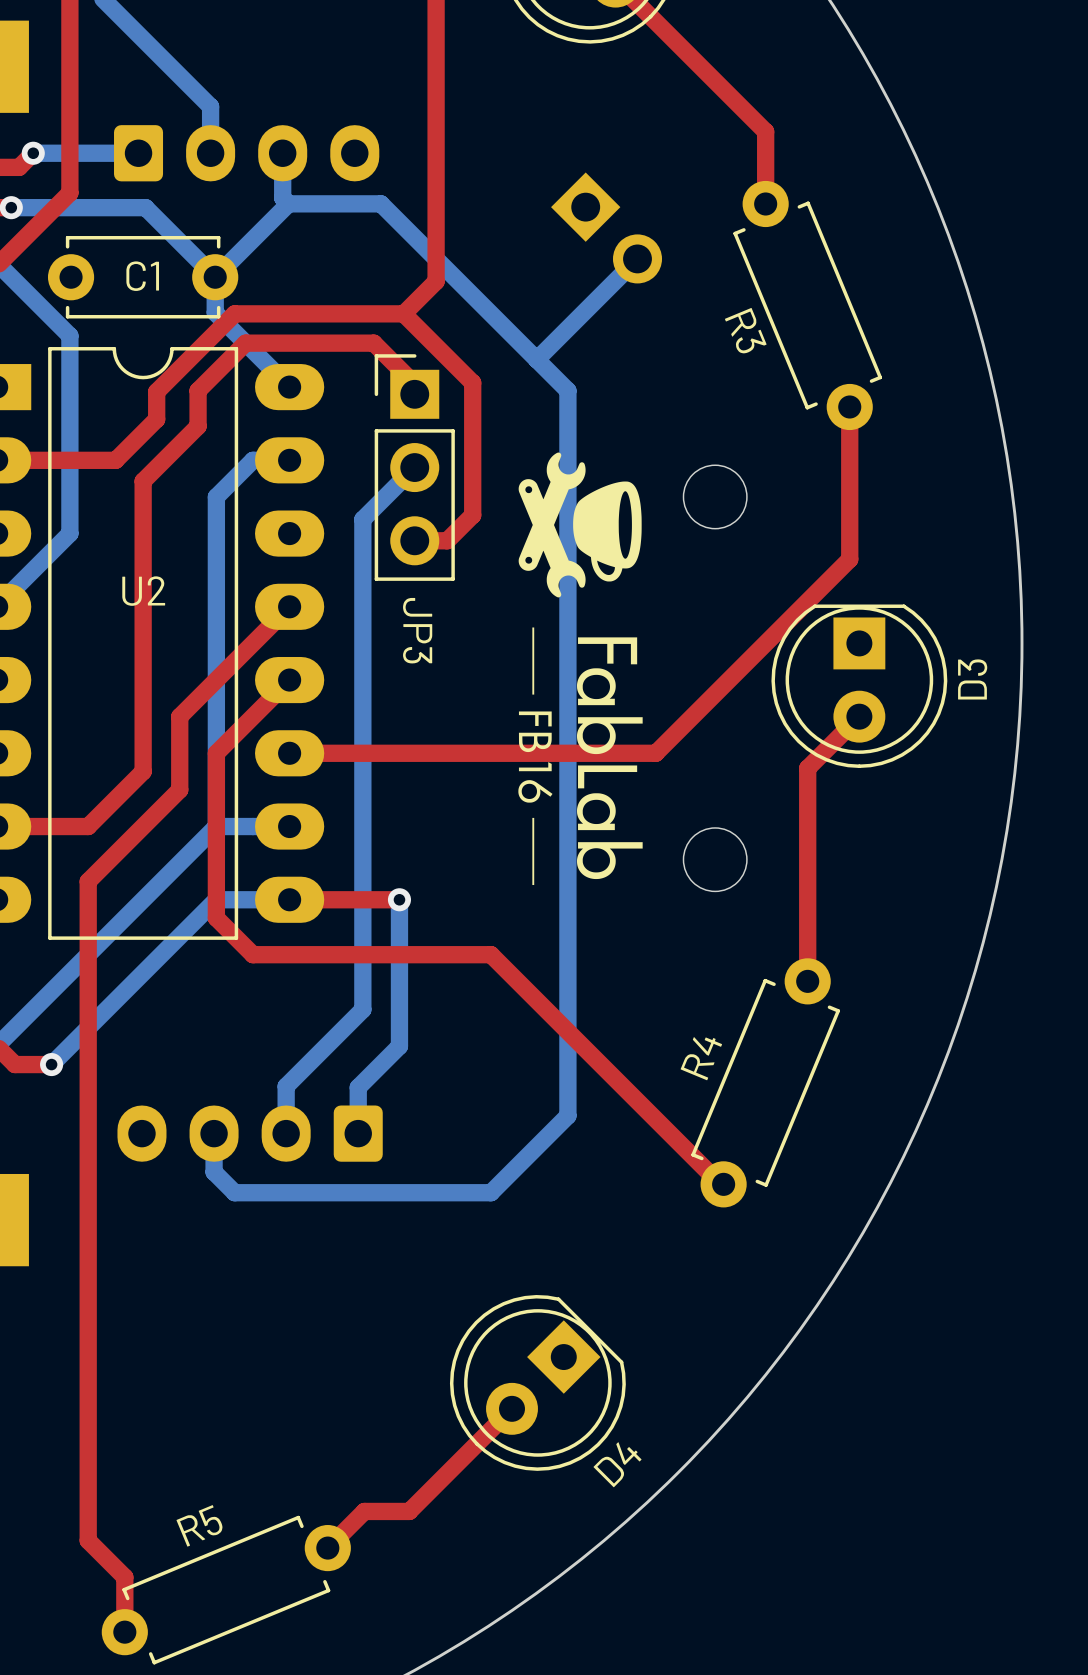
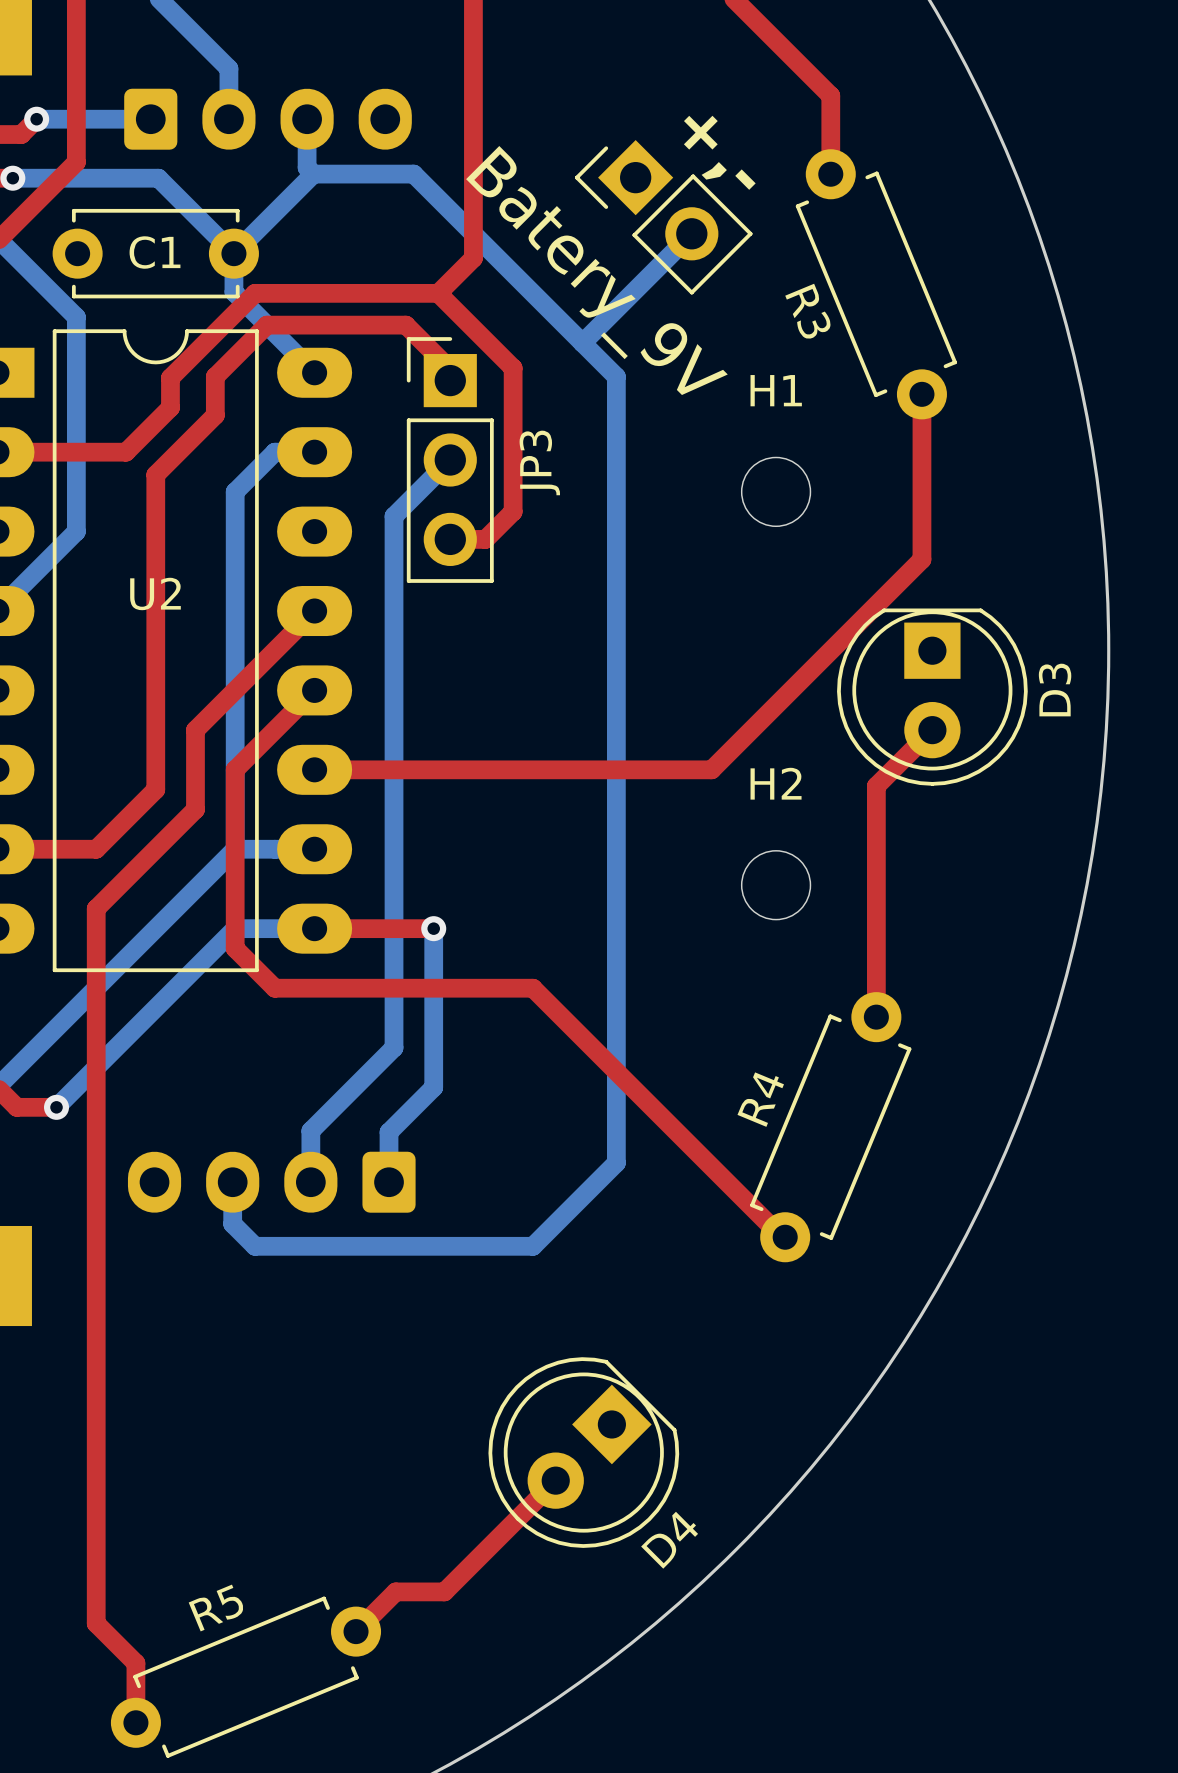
part side: bottom (606, 227) -> top (663, 217)
H1 name: none -> H1 (776, 390)
drawing: [518, 452, 643, 886] -> none
JP3 name rotation: 0° (417, 630) -> 180° (539, 462)
JP3 name position: JP3 (417, 630) -> JP3 (539, 462)
H2 name: none -> H2 (776, 783)

